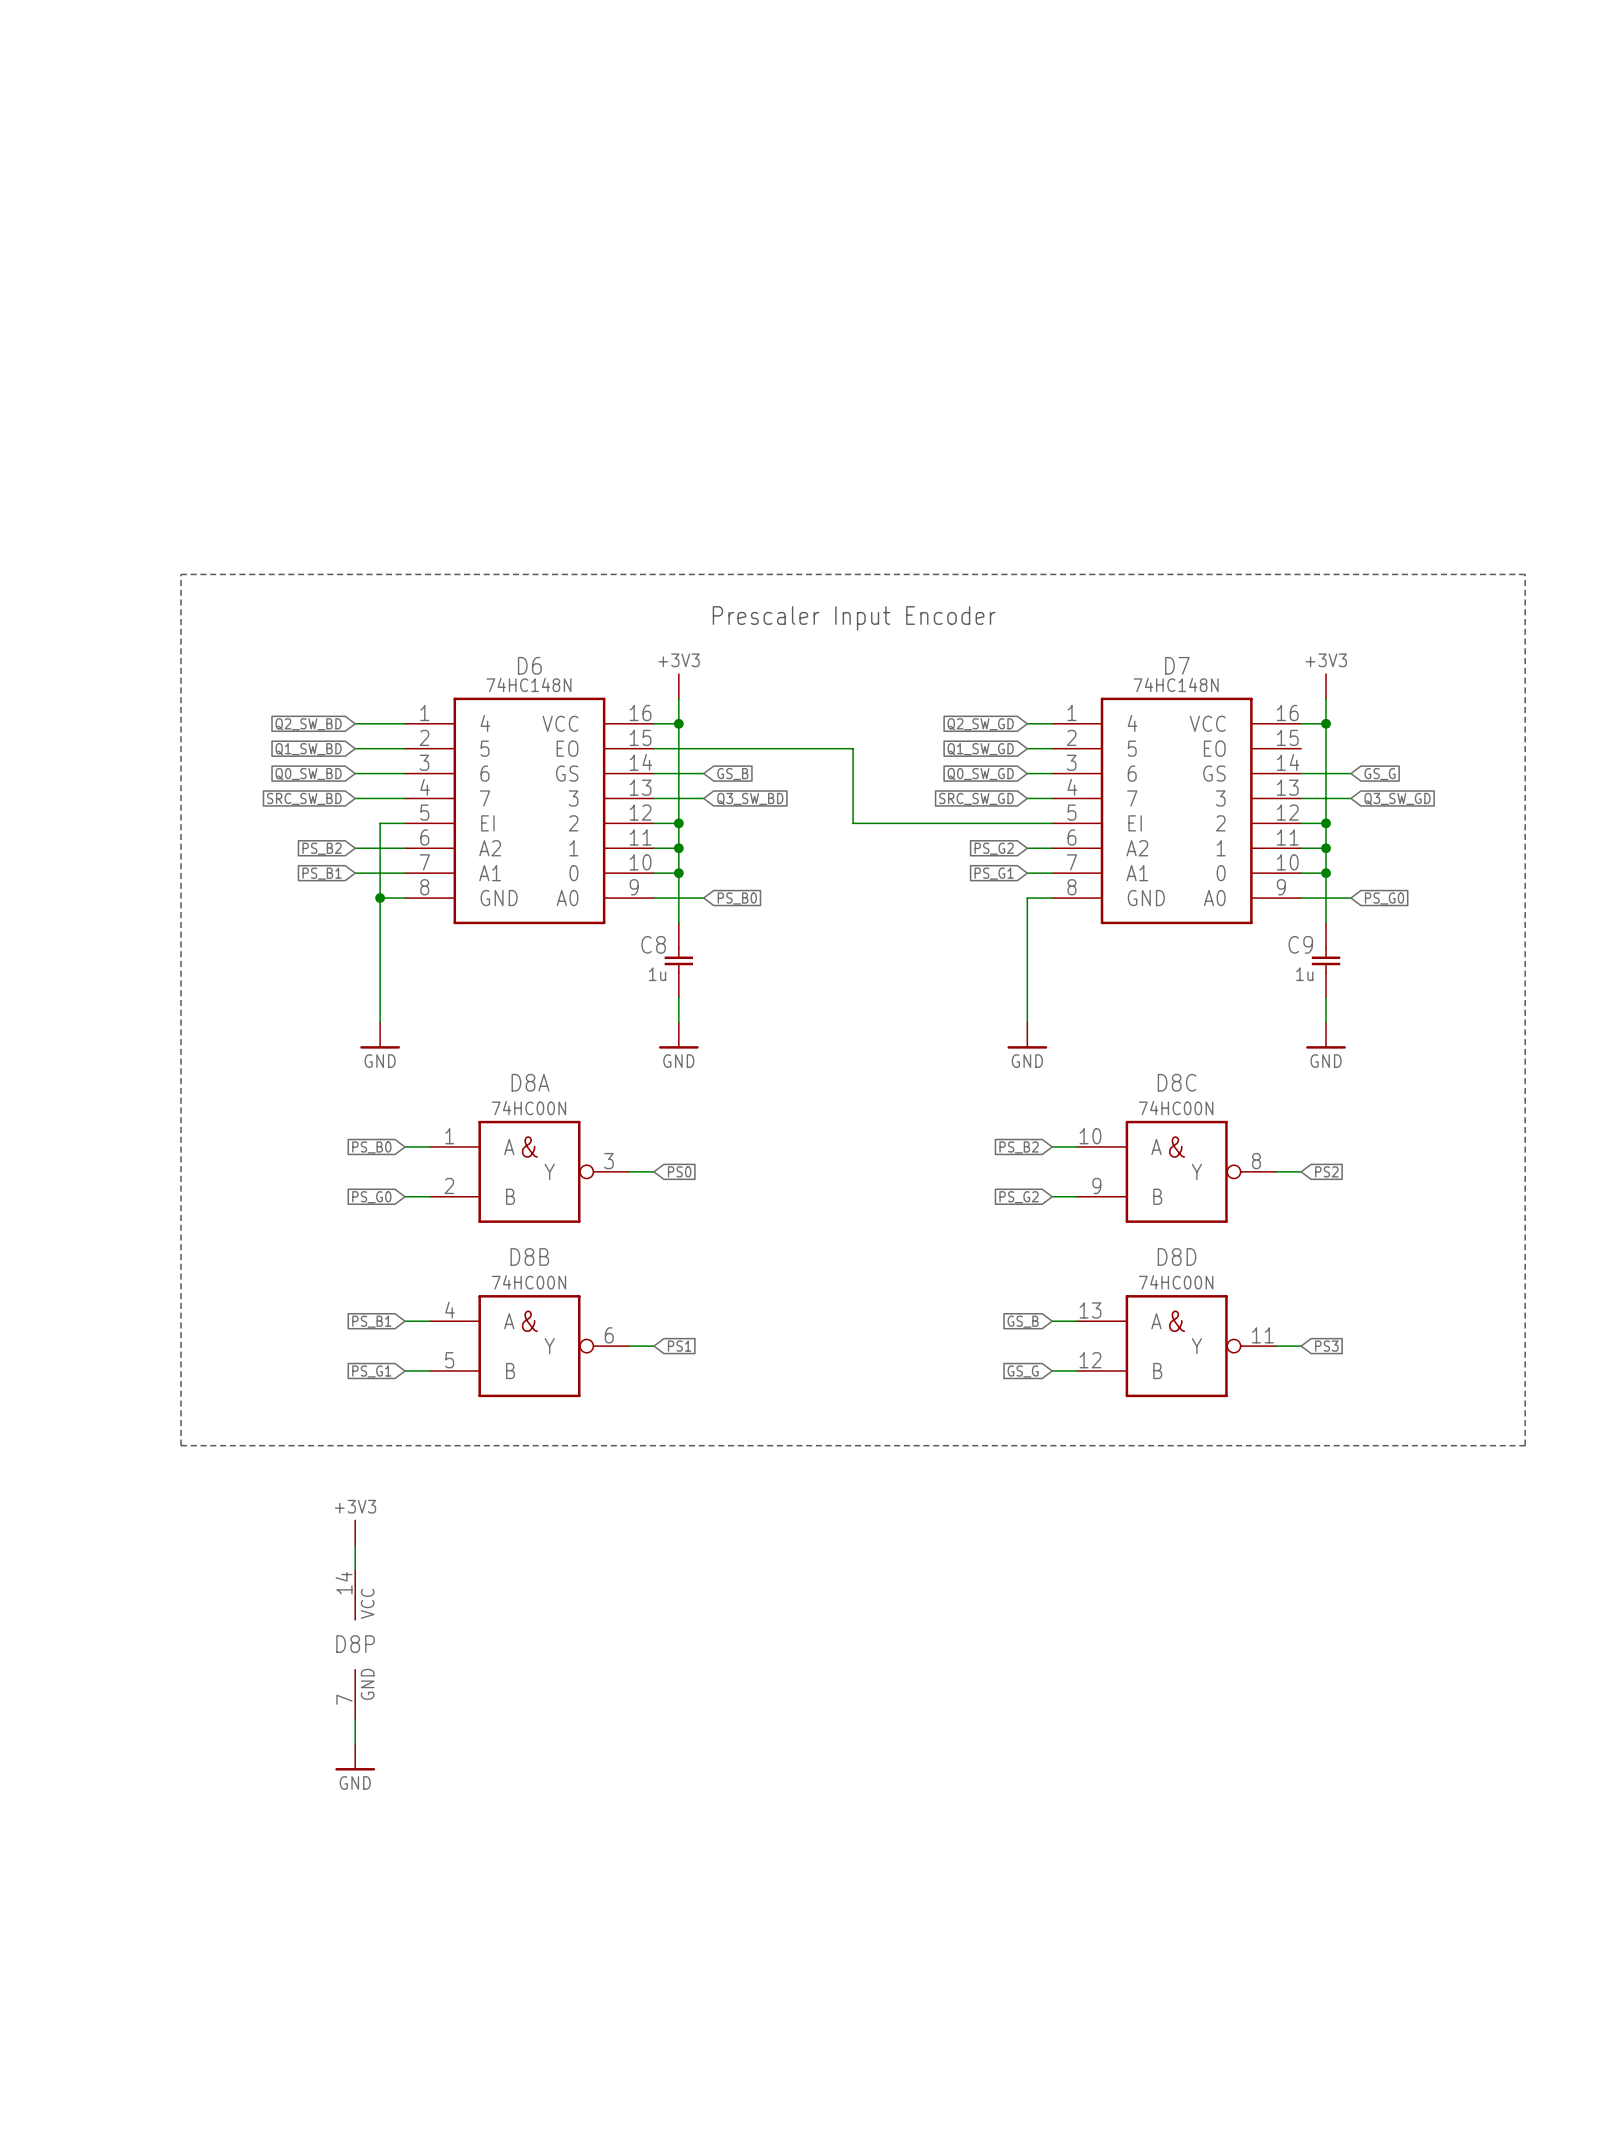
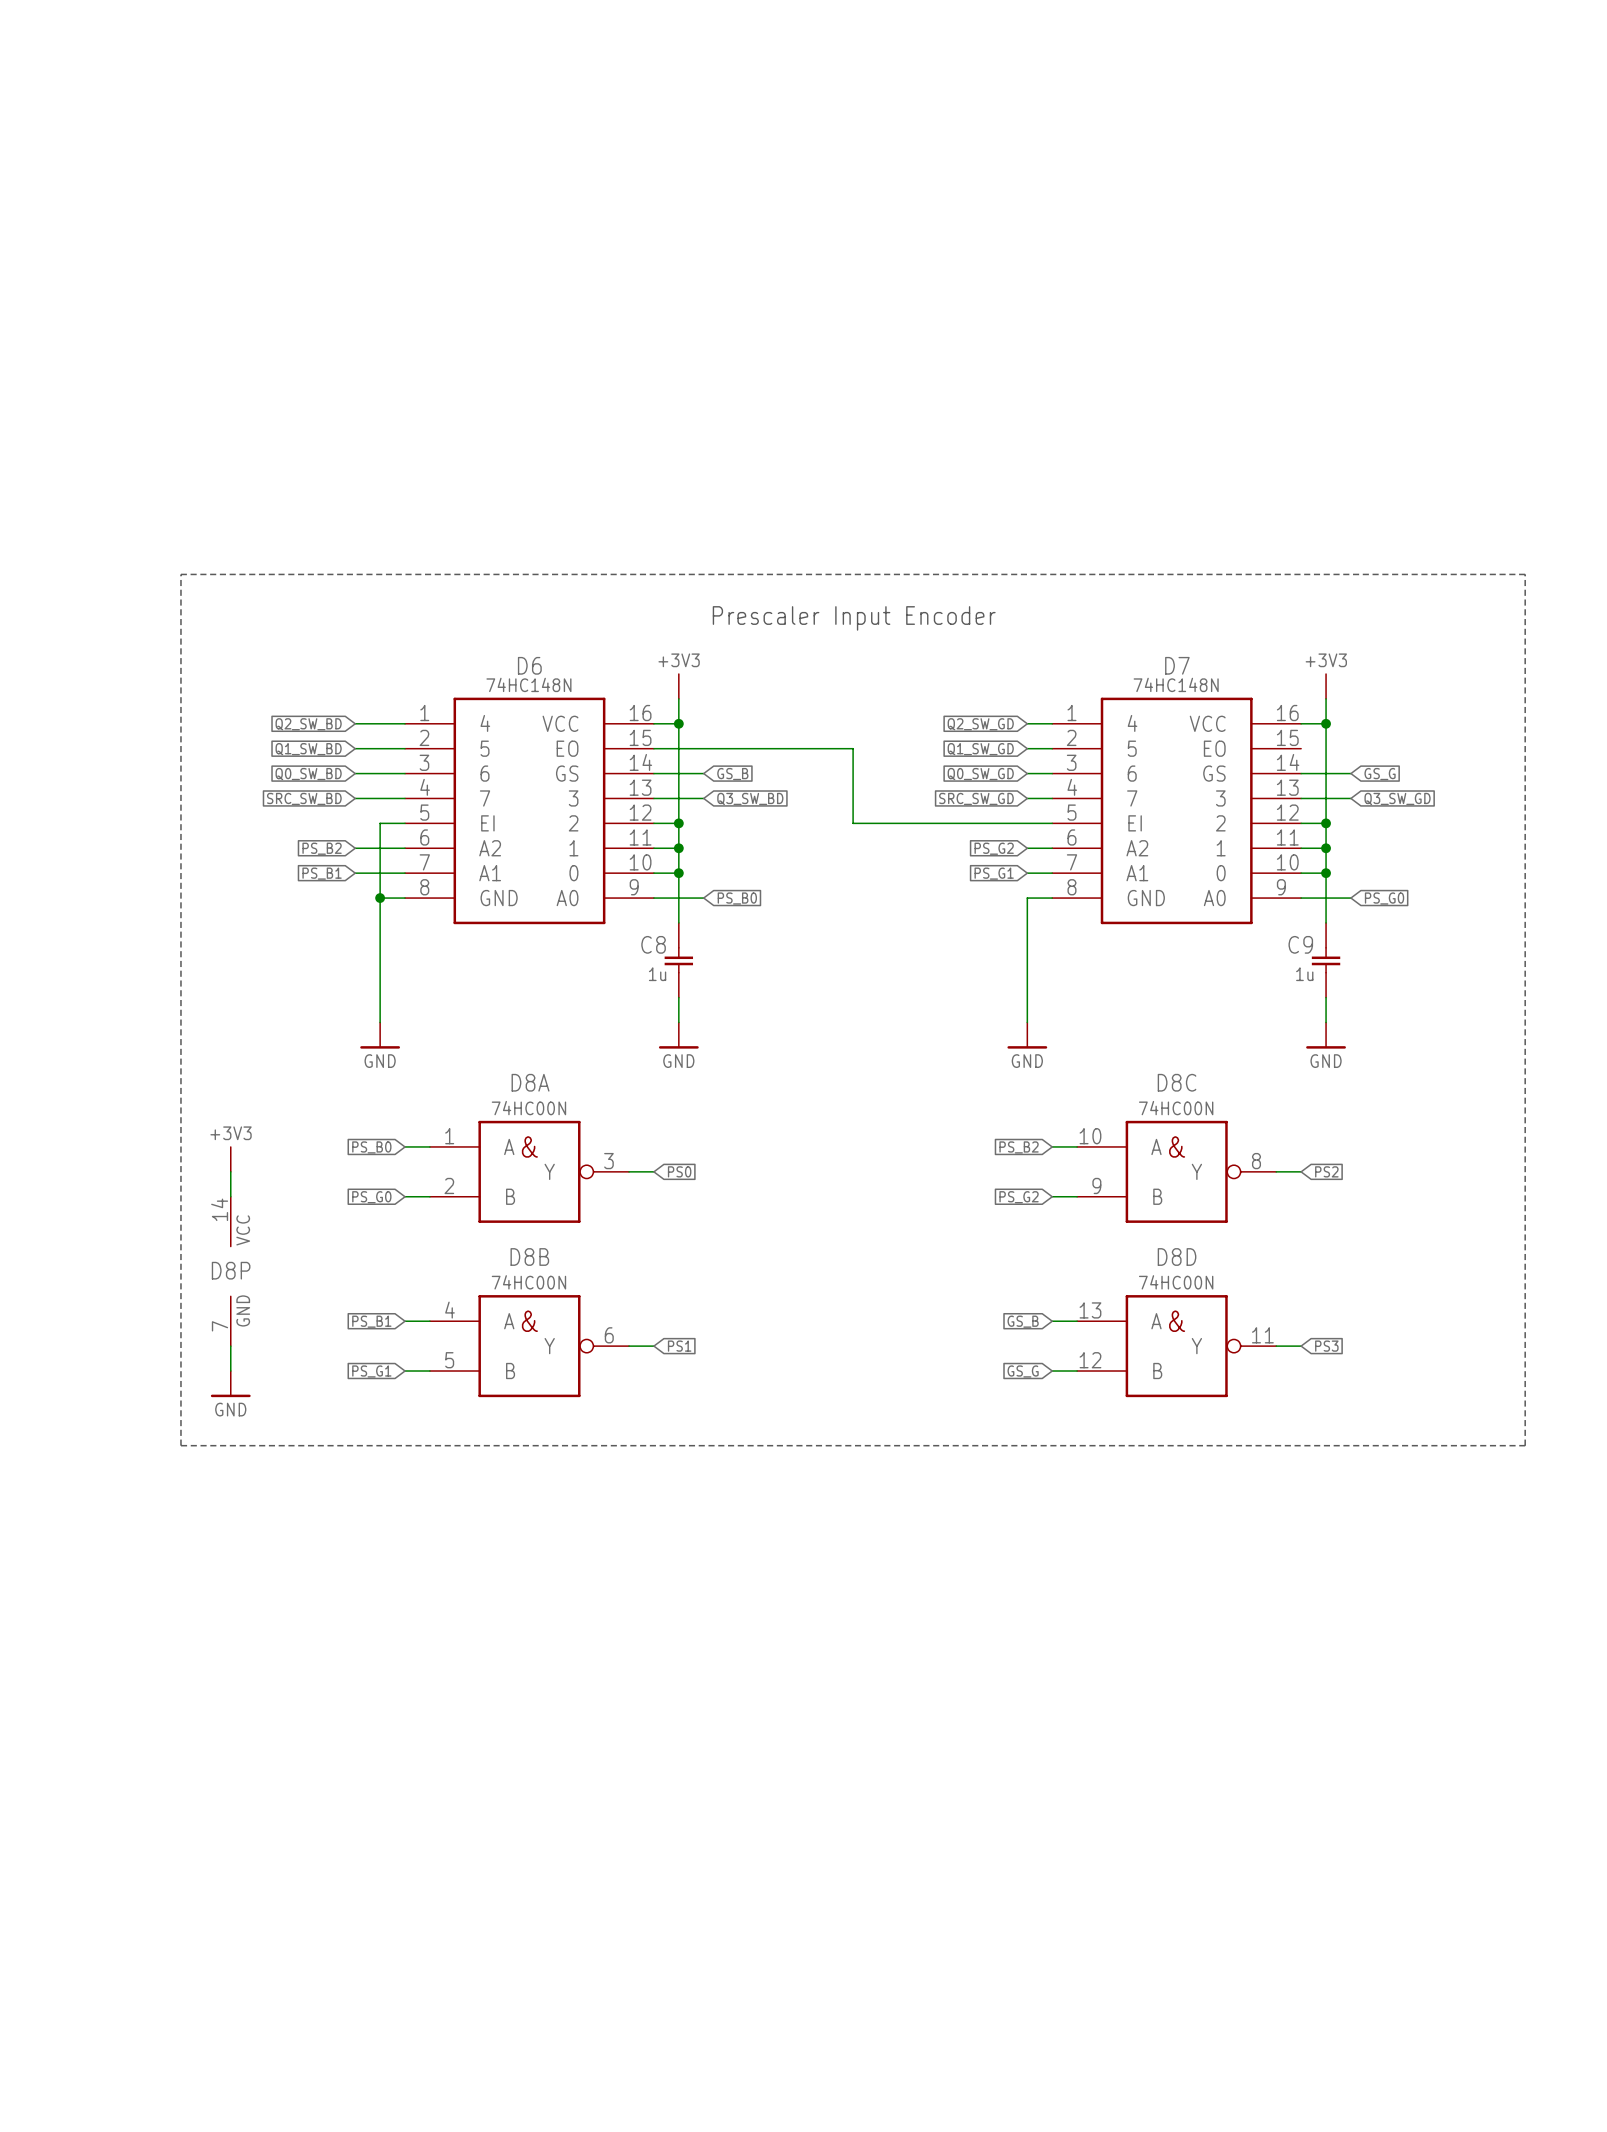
power symbol: none -> +3V3 (230, 1159)
wire: none -> (230, 1171) (230, 1196)
power symbol: none -> GND (230, 1384)
power symbol: +3V3 (355, 1532) -> none
wire: (355, 1545) (355, 1570) -> (230, 1346) (230, 1371)
D8P position: (355, 1644) -> (230, 1271)
wire: (355, 1719) (355, 1744) -> none
power symbol: GND (355, 1757) -> none

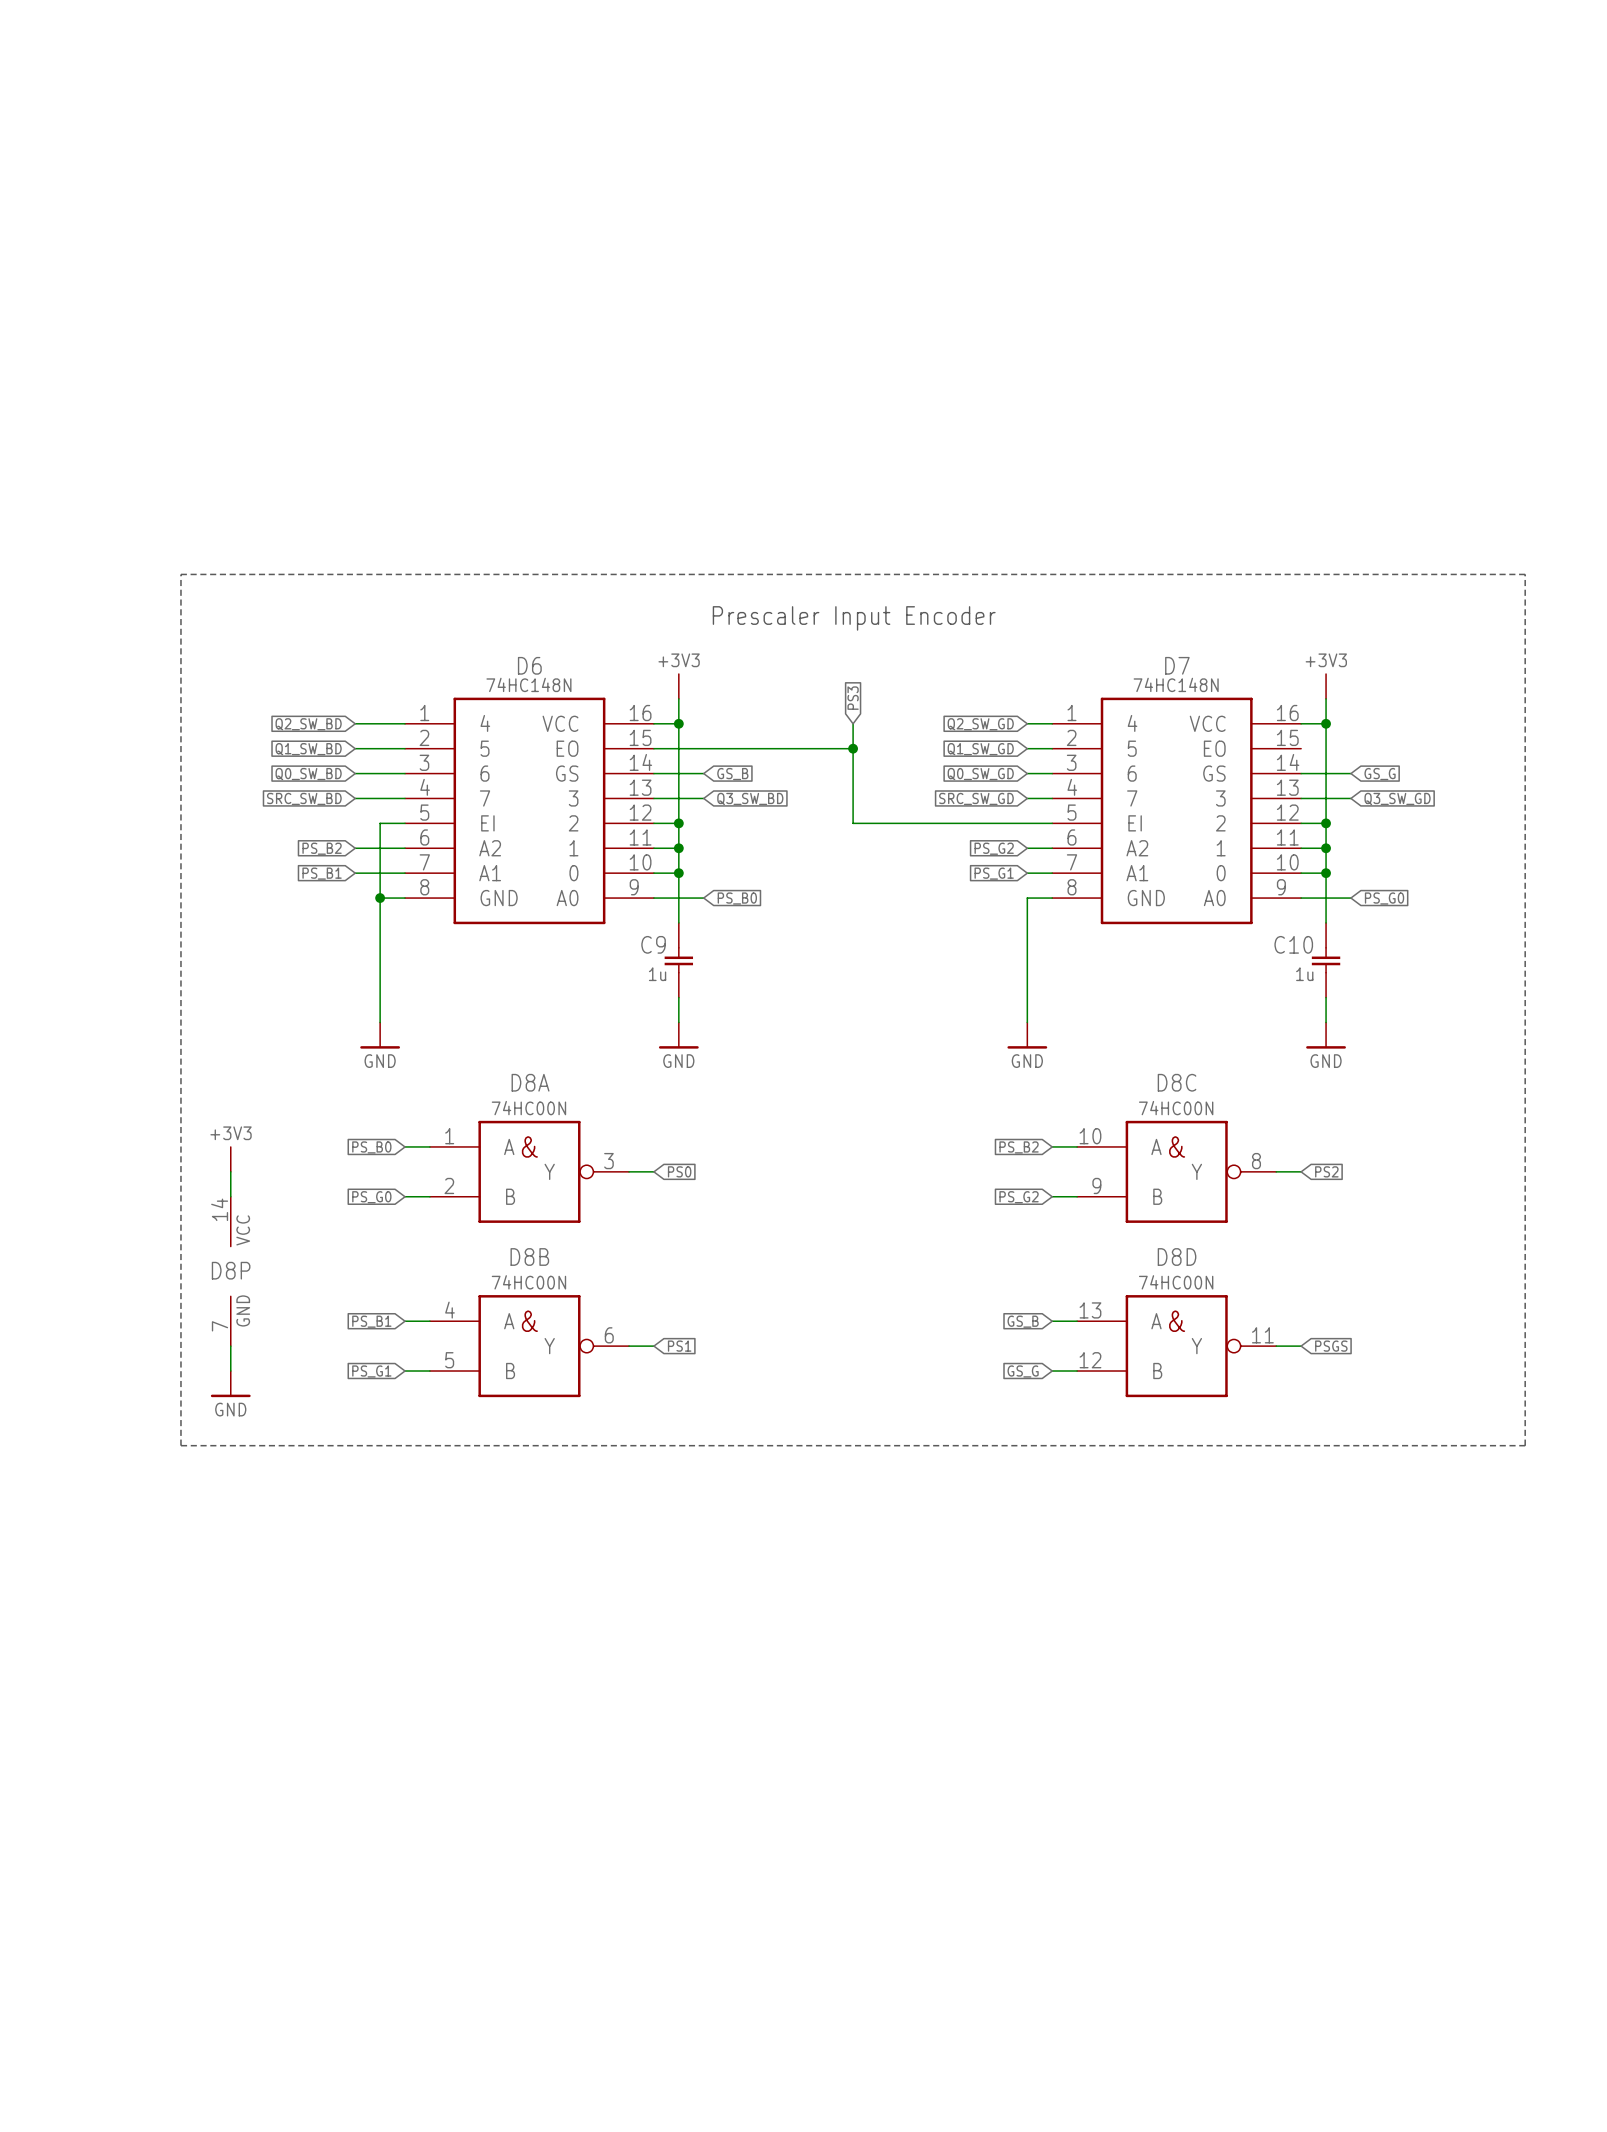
global label: none -> PS3 (853, 698)
wire: none -> (853, 723) (853, 748)
junction: none -> (853, 748)
C8 name: C8 (653, 944) -> C9 (653, 944)
C9 name: C9 (1300, 944) -> C10 (1293, 944)
global label: PS3 (1326, 1346) -> PSGS (1331, 1346)

